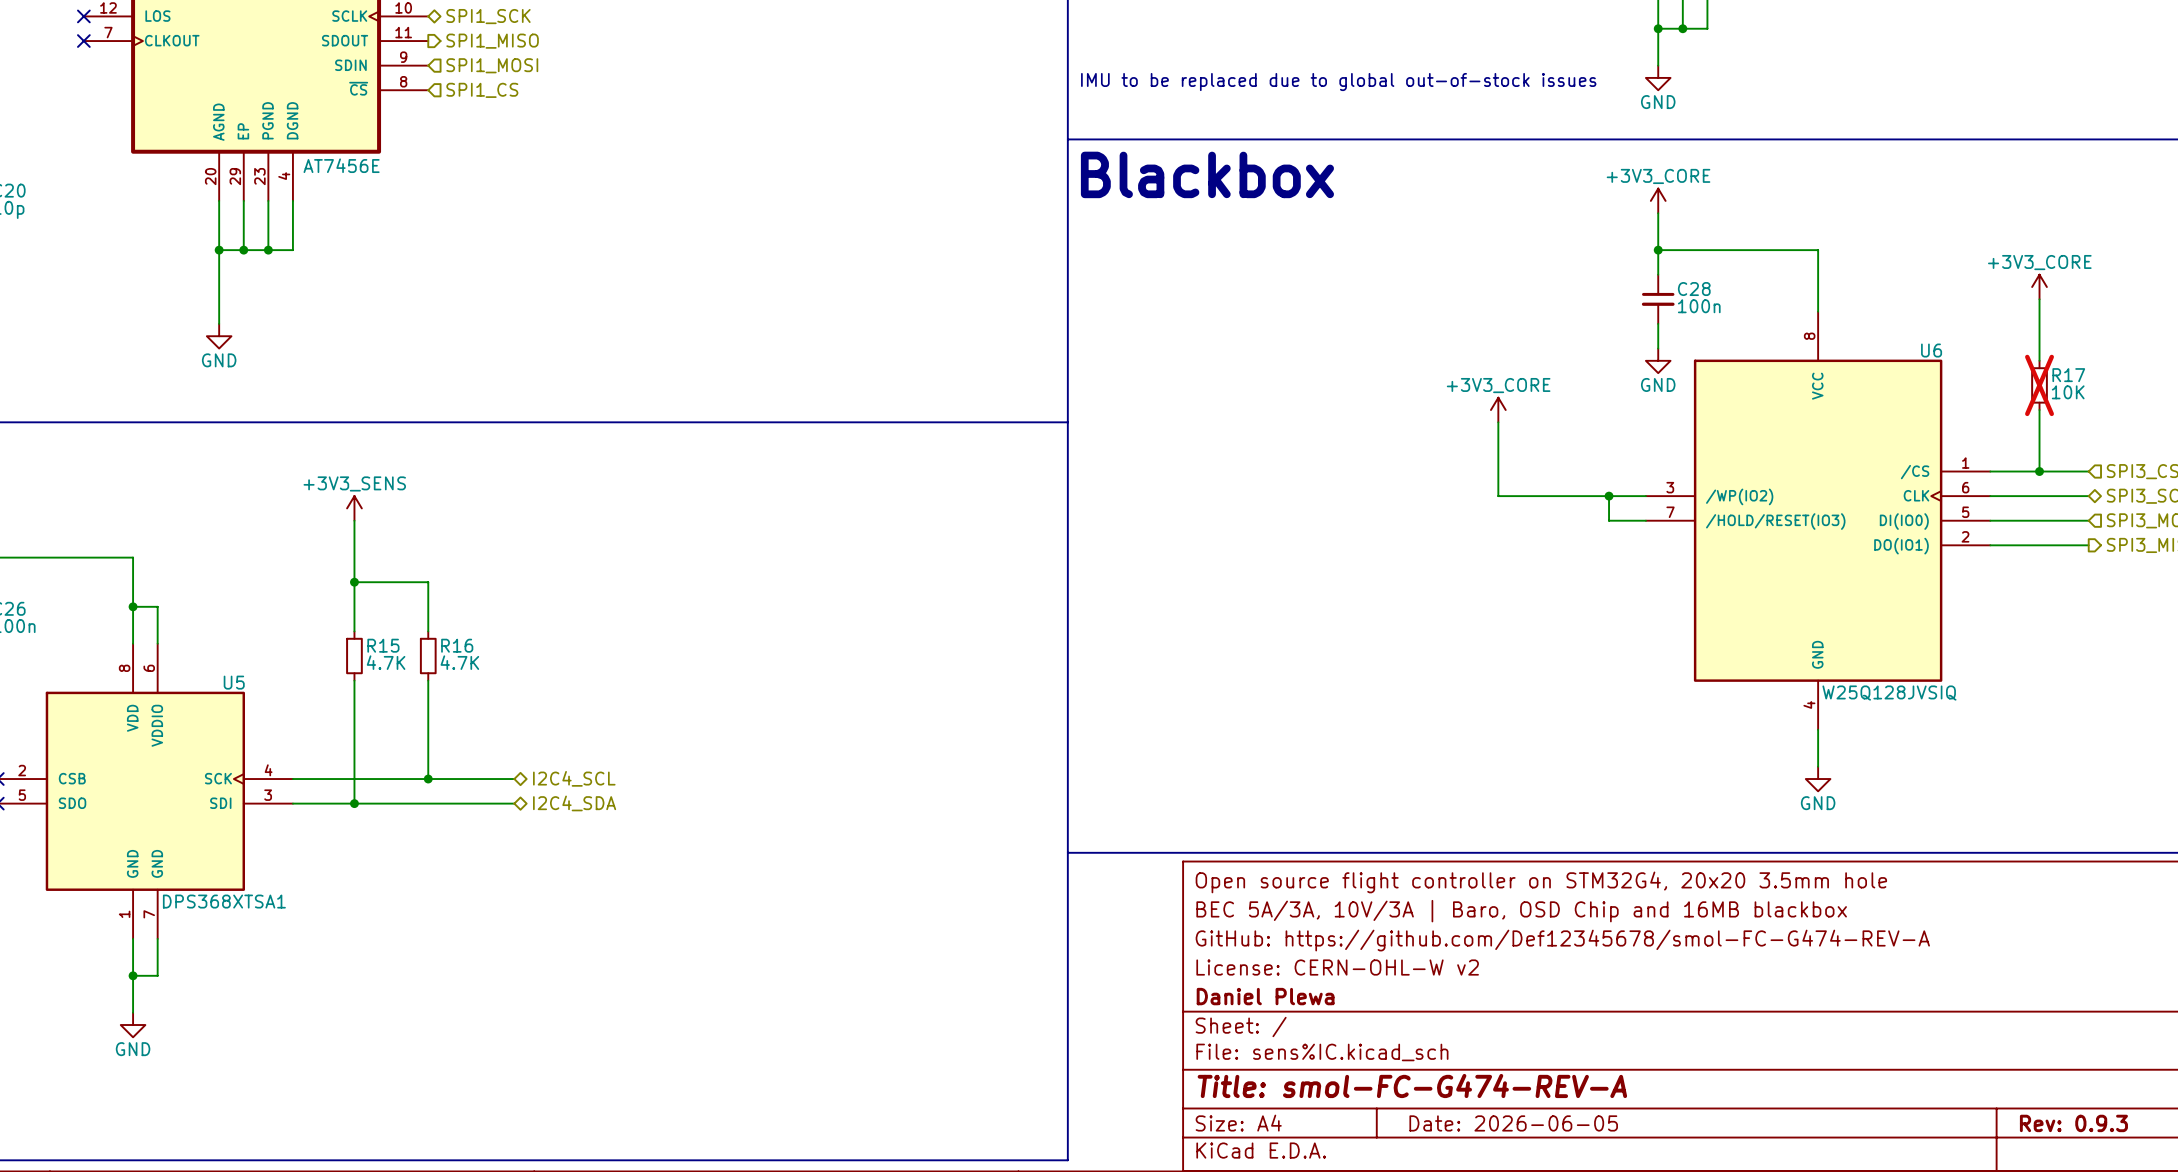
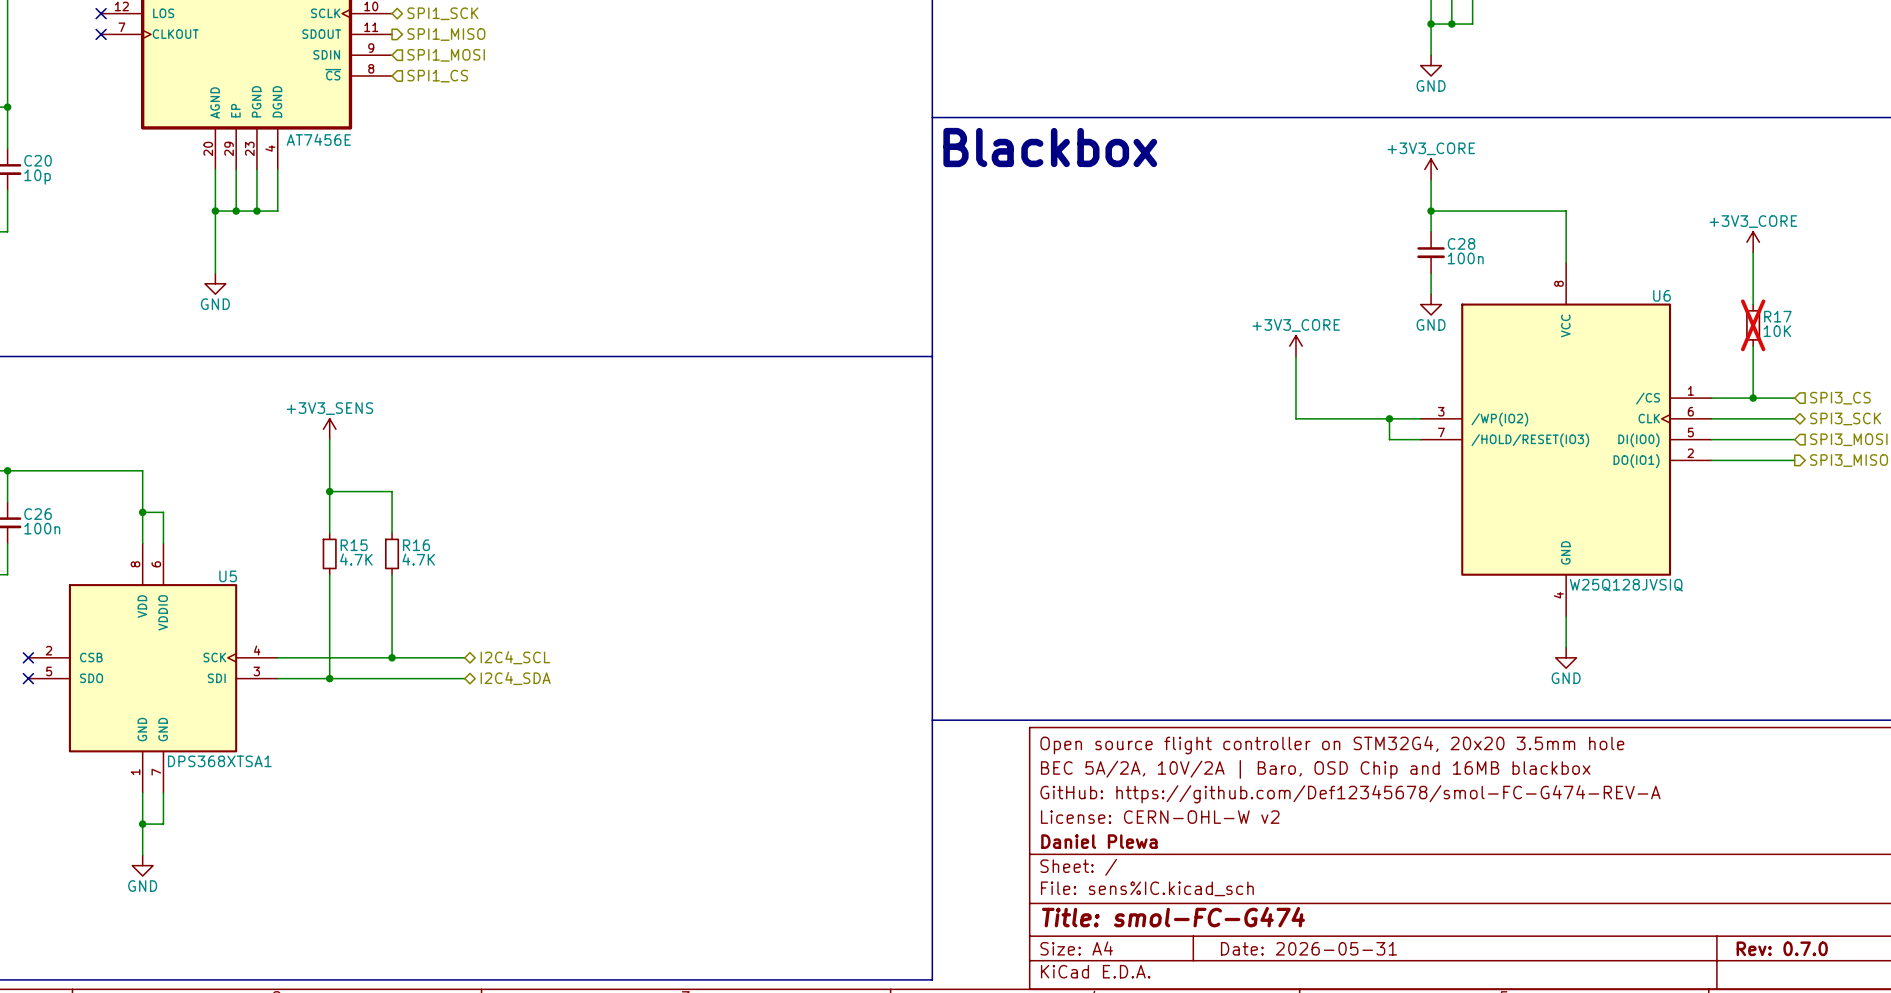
text: IMU to be replaced due to global out-of-stock issues (1338, 82) -> none
title block: BEC 5A/3A, 10V/3A | Baro, OSD Chip and 16MB blackbox (1521, 911) -> BEC 5A/2A, 10V/2A | Baro, OSD Chip and 16MB blackbox (1315, 769)
title block: Title: smol-FC-G474-REV-A (1412, 1086) -> Title: smol-FC-G474 (1173, 917)
title block: Date: 2026-06-05 (1513, 1123) -> Date: 2026-05-31 (1308, 948)
title block: Rev: 0.9.3 (2073, 1123) -> Rev: 0.7.0 (1782, 948)

